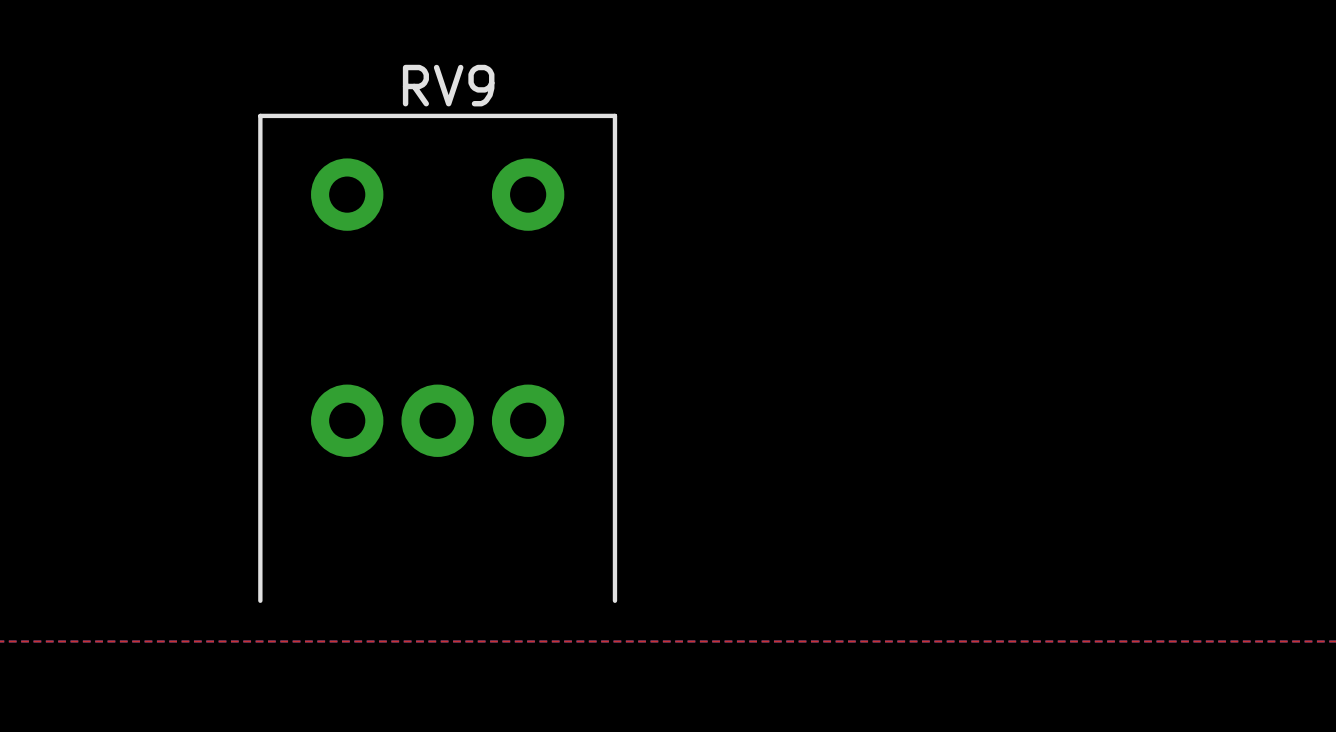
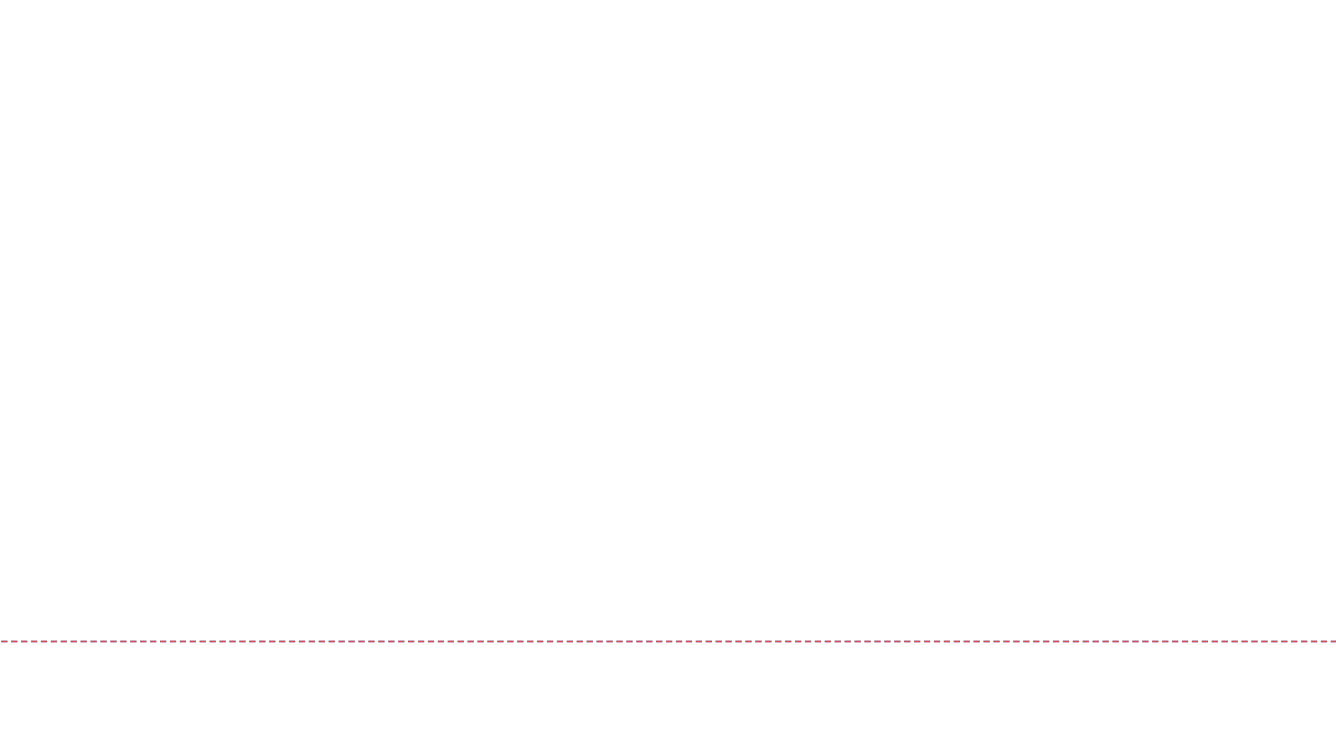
RV9: (437, 358) -> none

